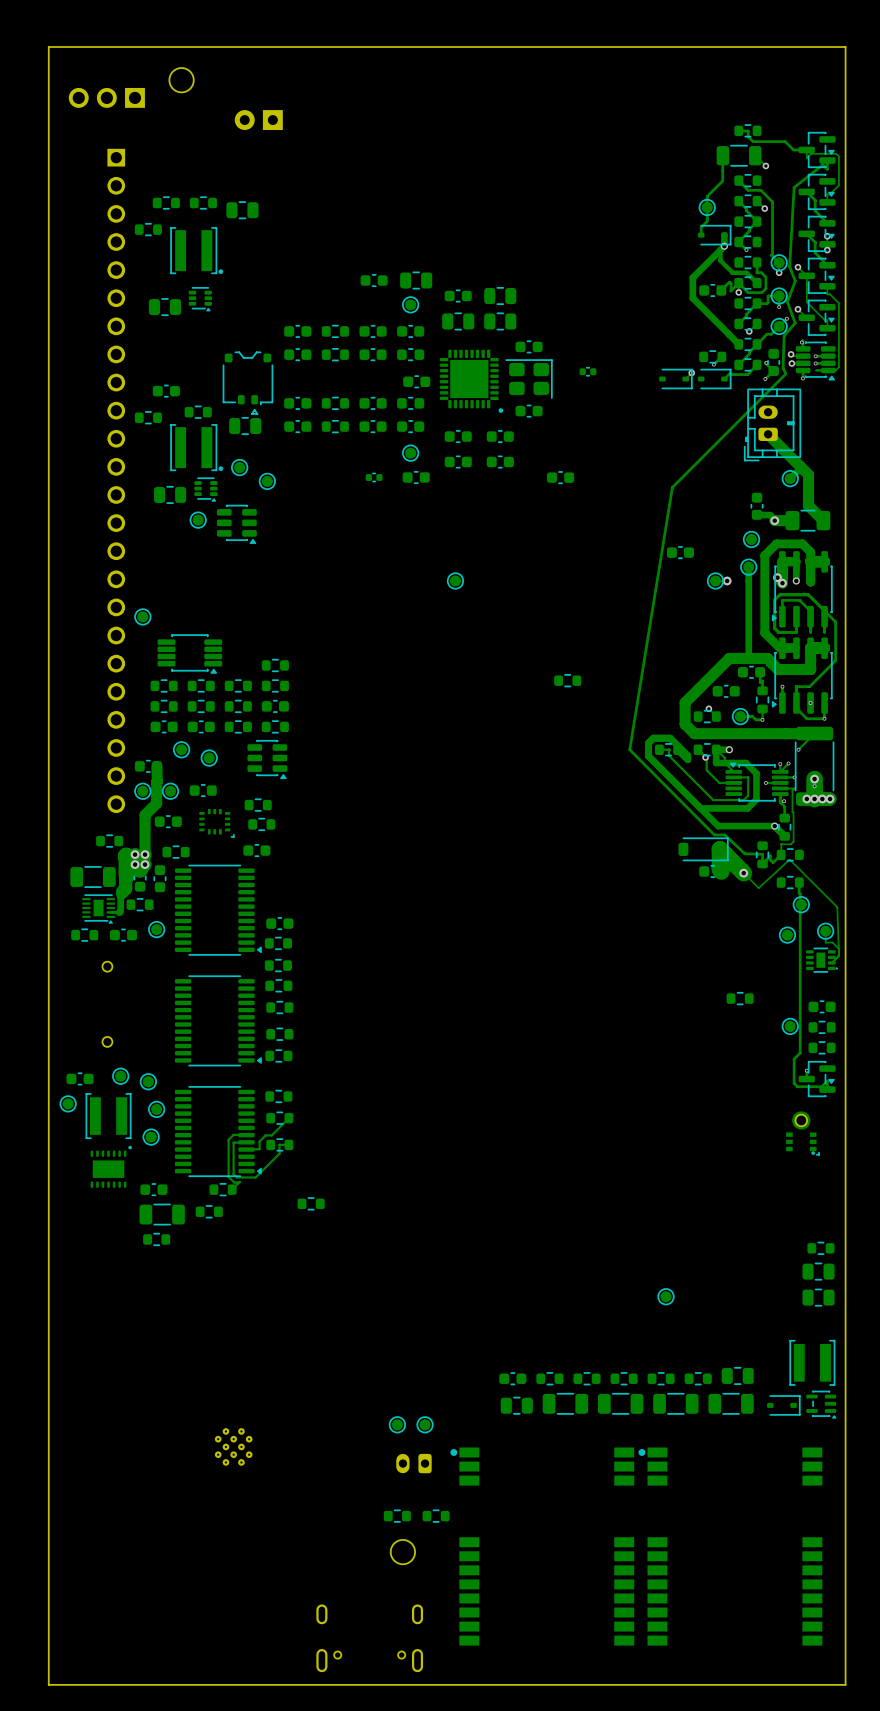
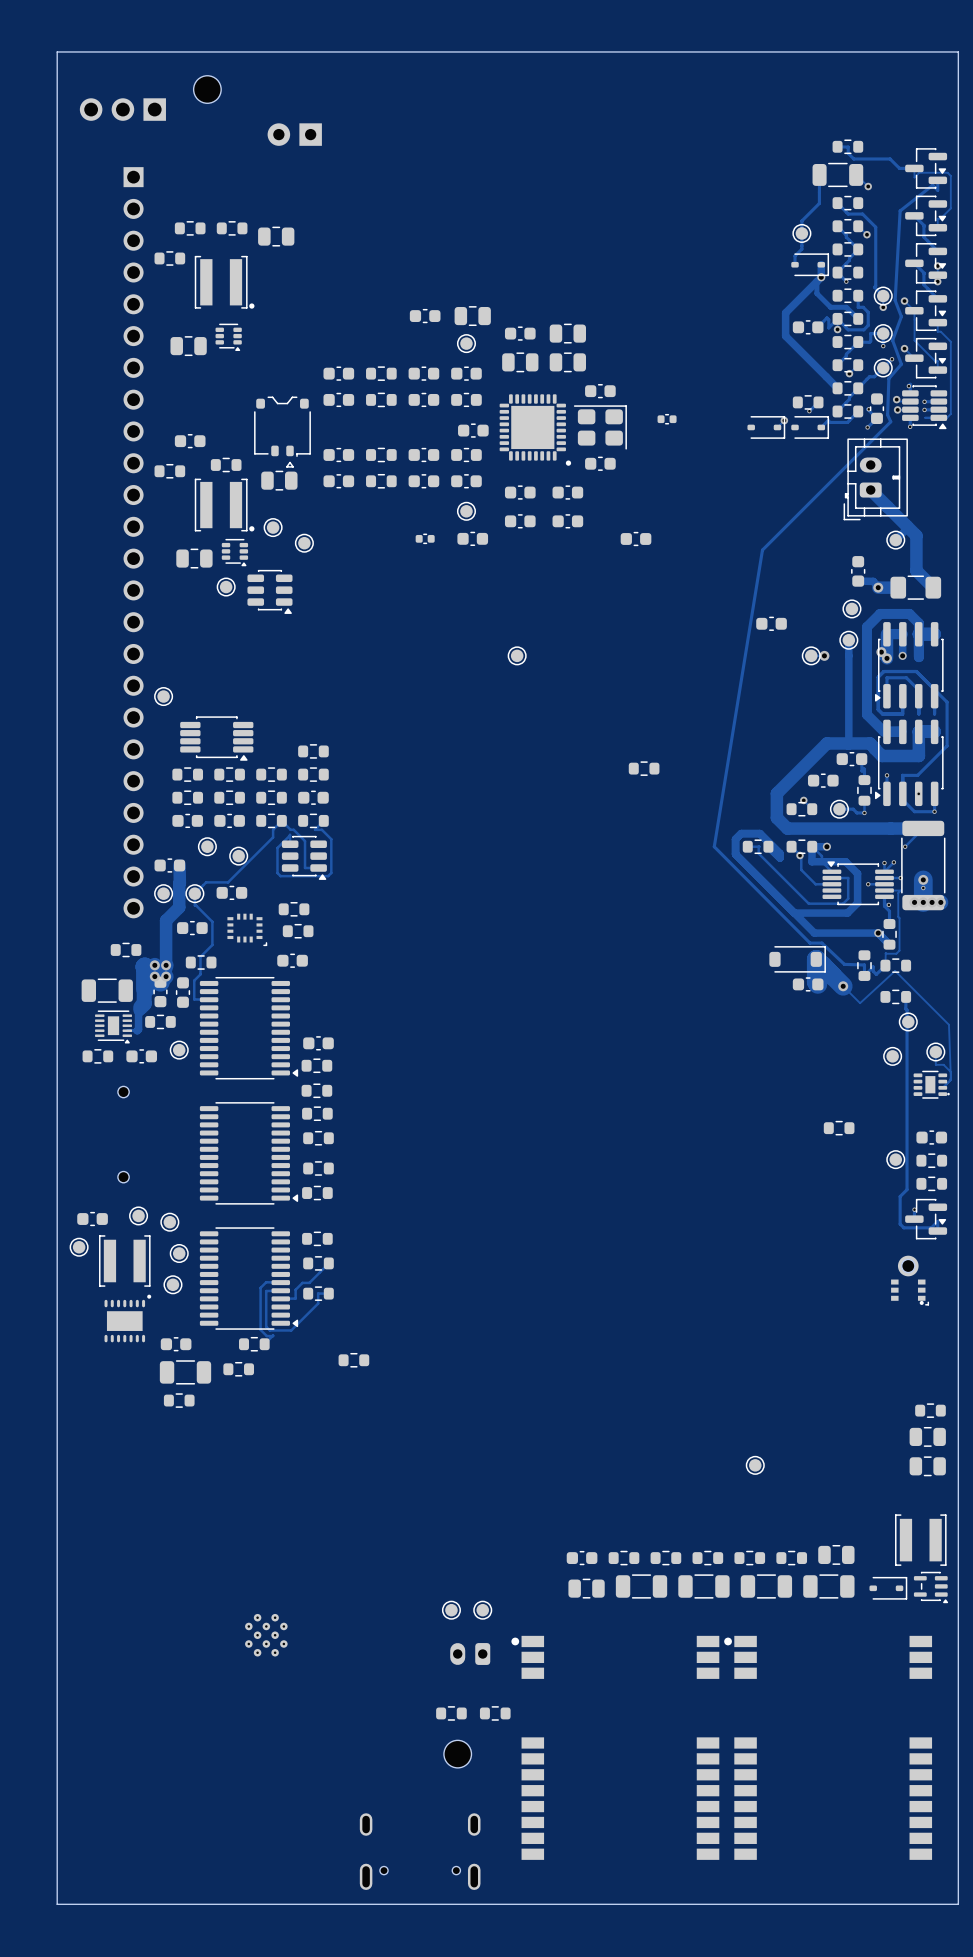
track: none -> (323, 820) (315, 829) (321, 829) (331, 839) (331, 873) (328, 876) (280, 876) (277, 873) (277, 847) (290, 834) (290, 844)
track: none -> (318, 868) (305, 868) (305, 841) (281, 820) (273, 829) (273, 837) (228, 882) (206, 882) (194, 893) (194, 905) (212, 921) (212, 944) (200, 956) (200, 974) (194, 980) (194, 999) (209, 999)

